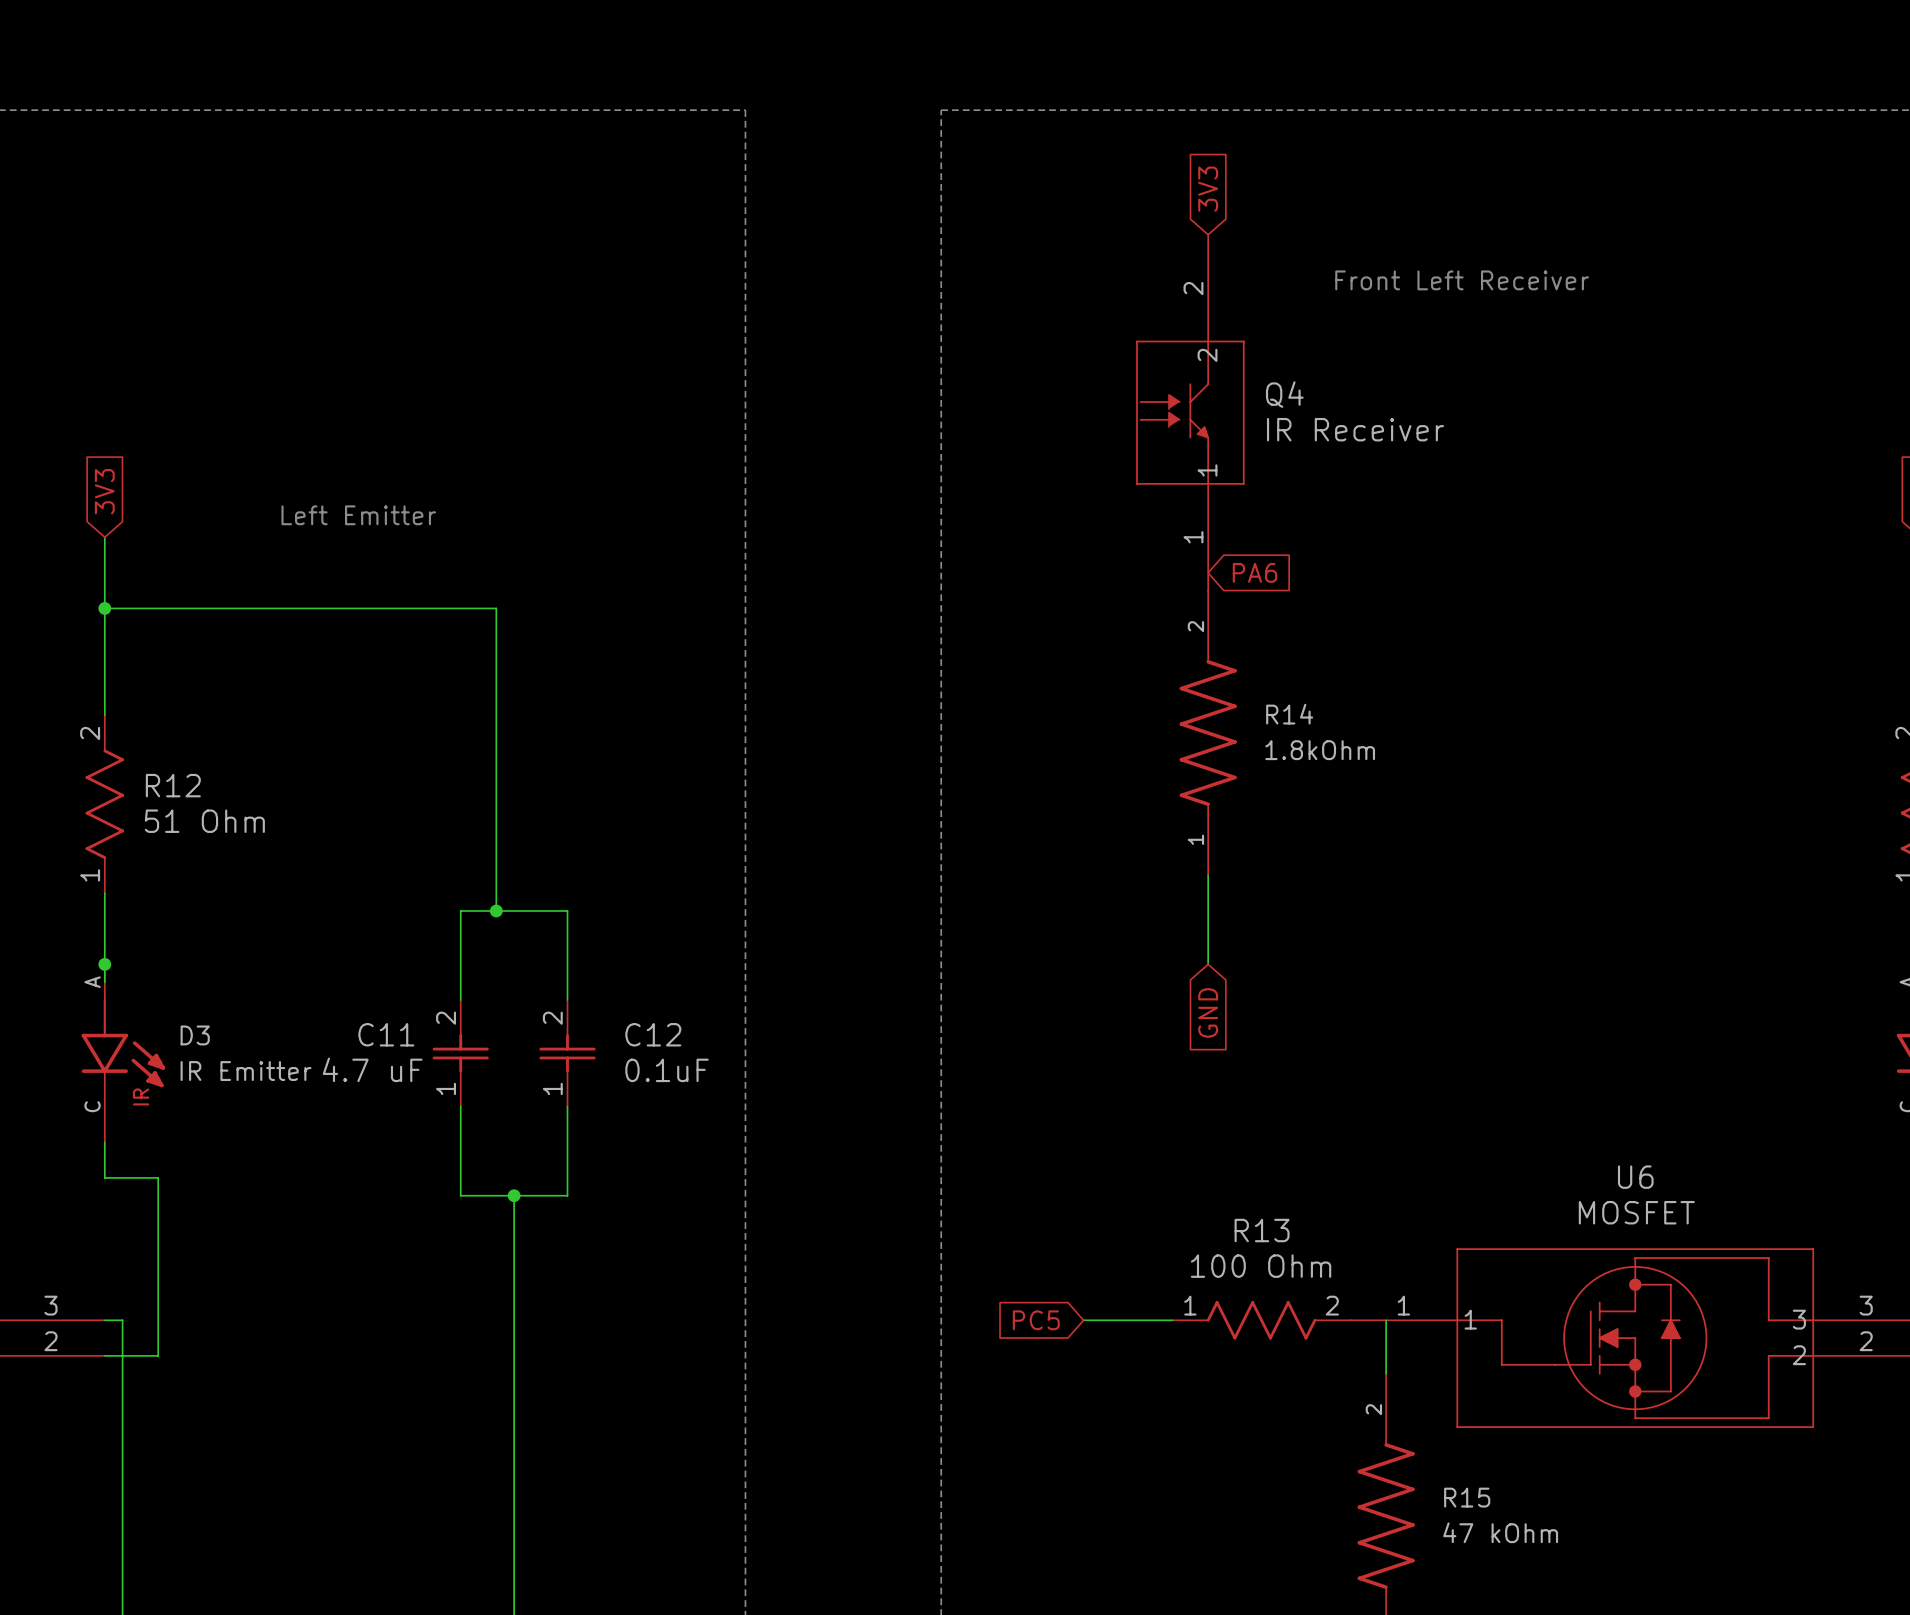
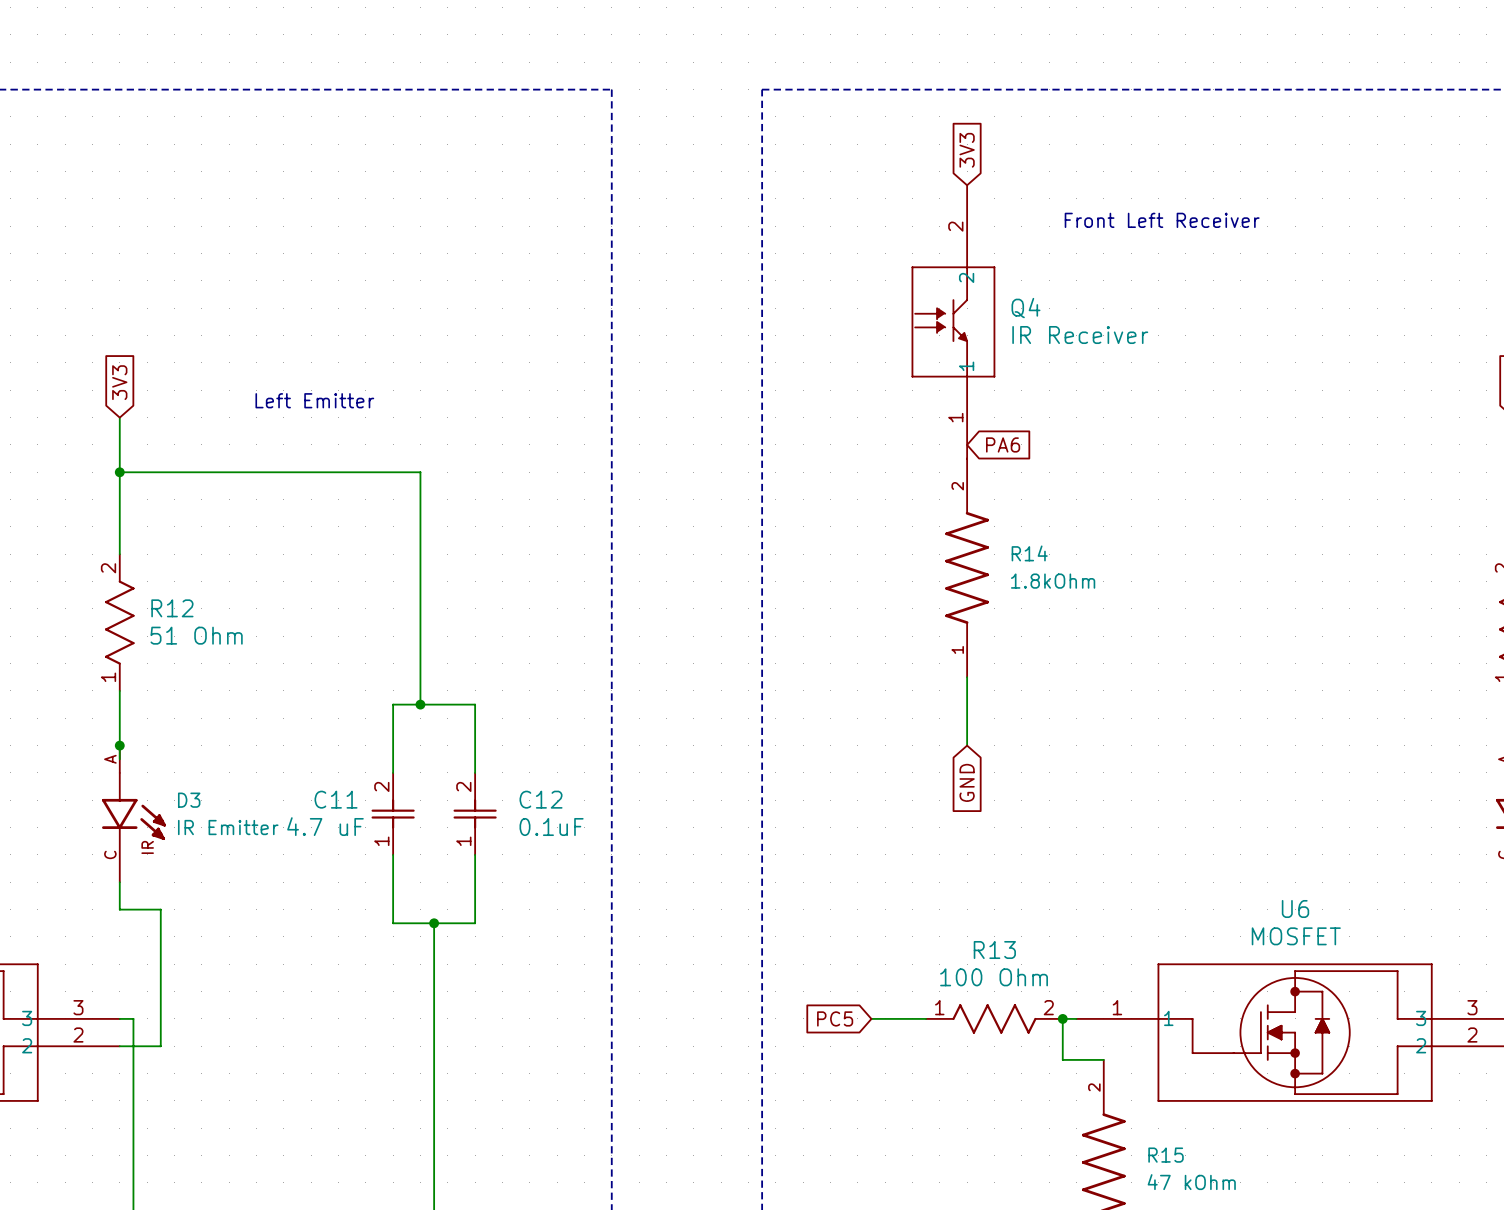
R13 position: (1261, 1320) -> (994, 1018)
junction: none -> (1062, 1018)
wire: (1386, 1320) (1386, 1373) -> (1076, 1018) (1062, 1018) (1062, 1059) (1103, 1059)

